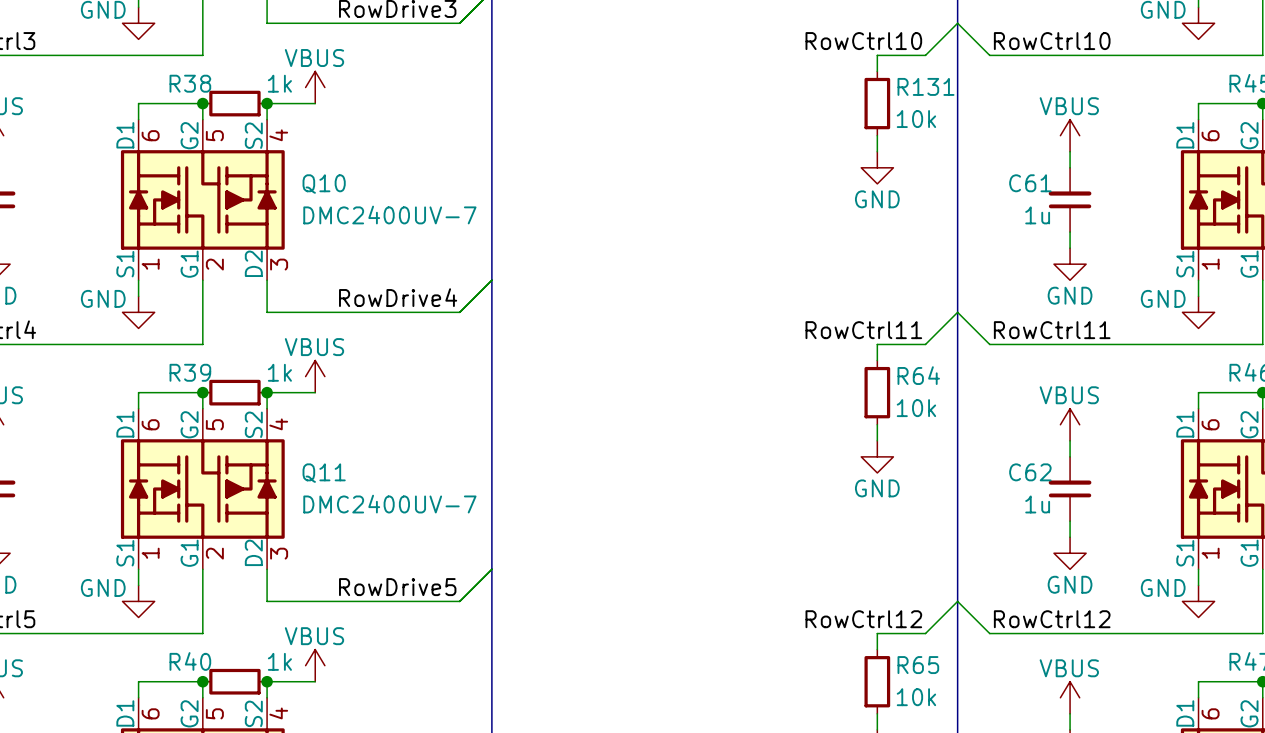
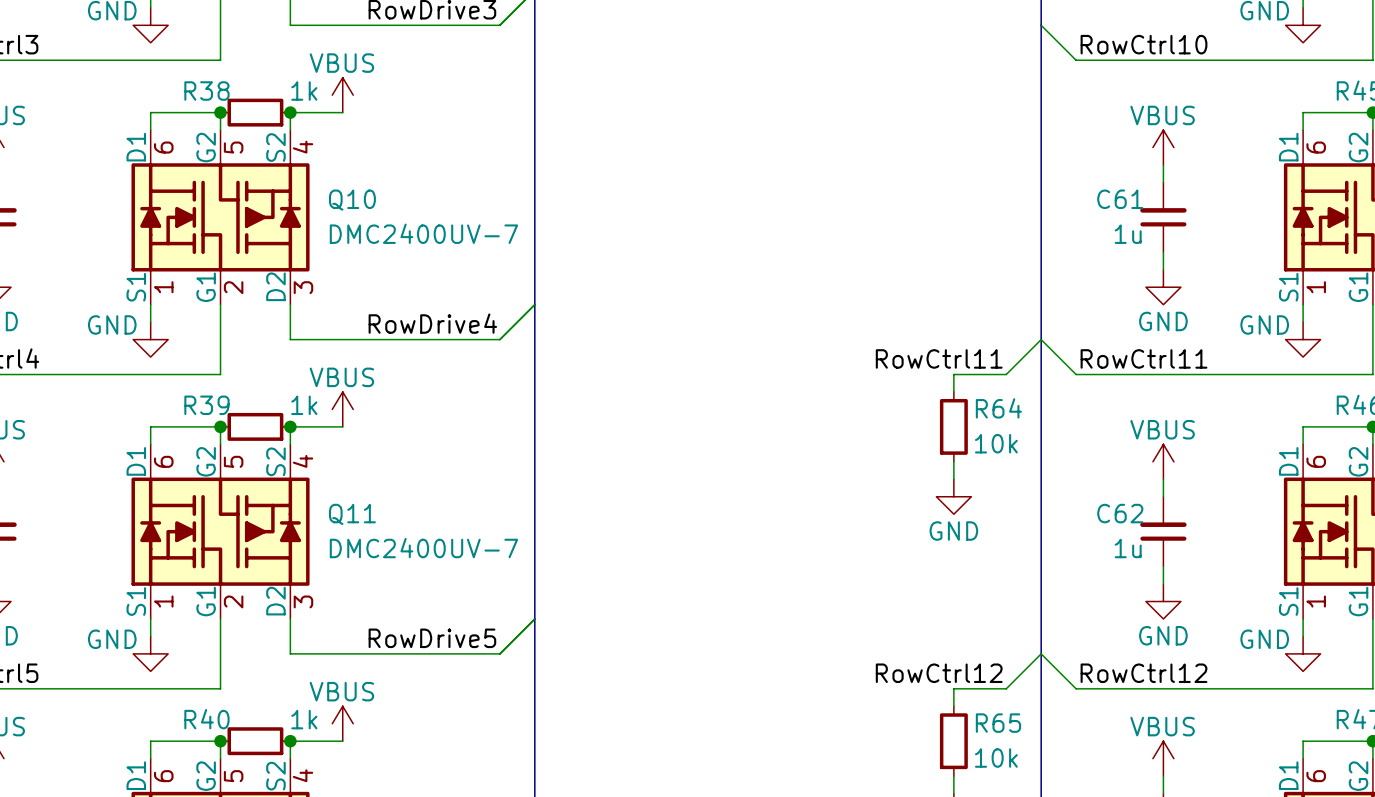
wire: (957, 23) (925, 55) (877, 55) (877, 71) -> none
label: RowCtrl10 (863, 41) -> none
R131: (877, 103) -> none
wire: (877, 135) (877, 151) -> none
power symbol: GND (877, 167) -> none

